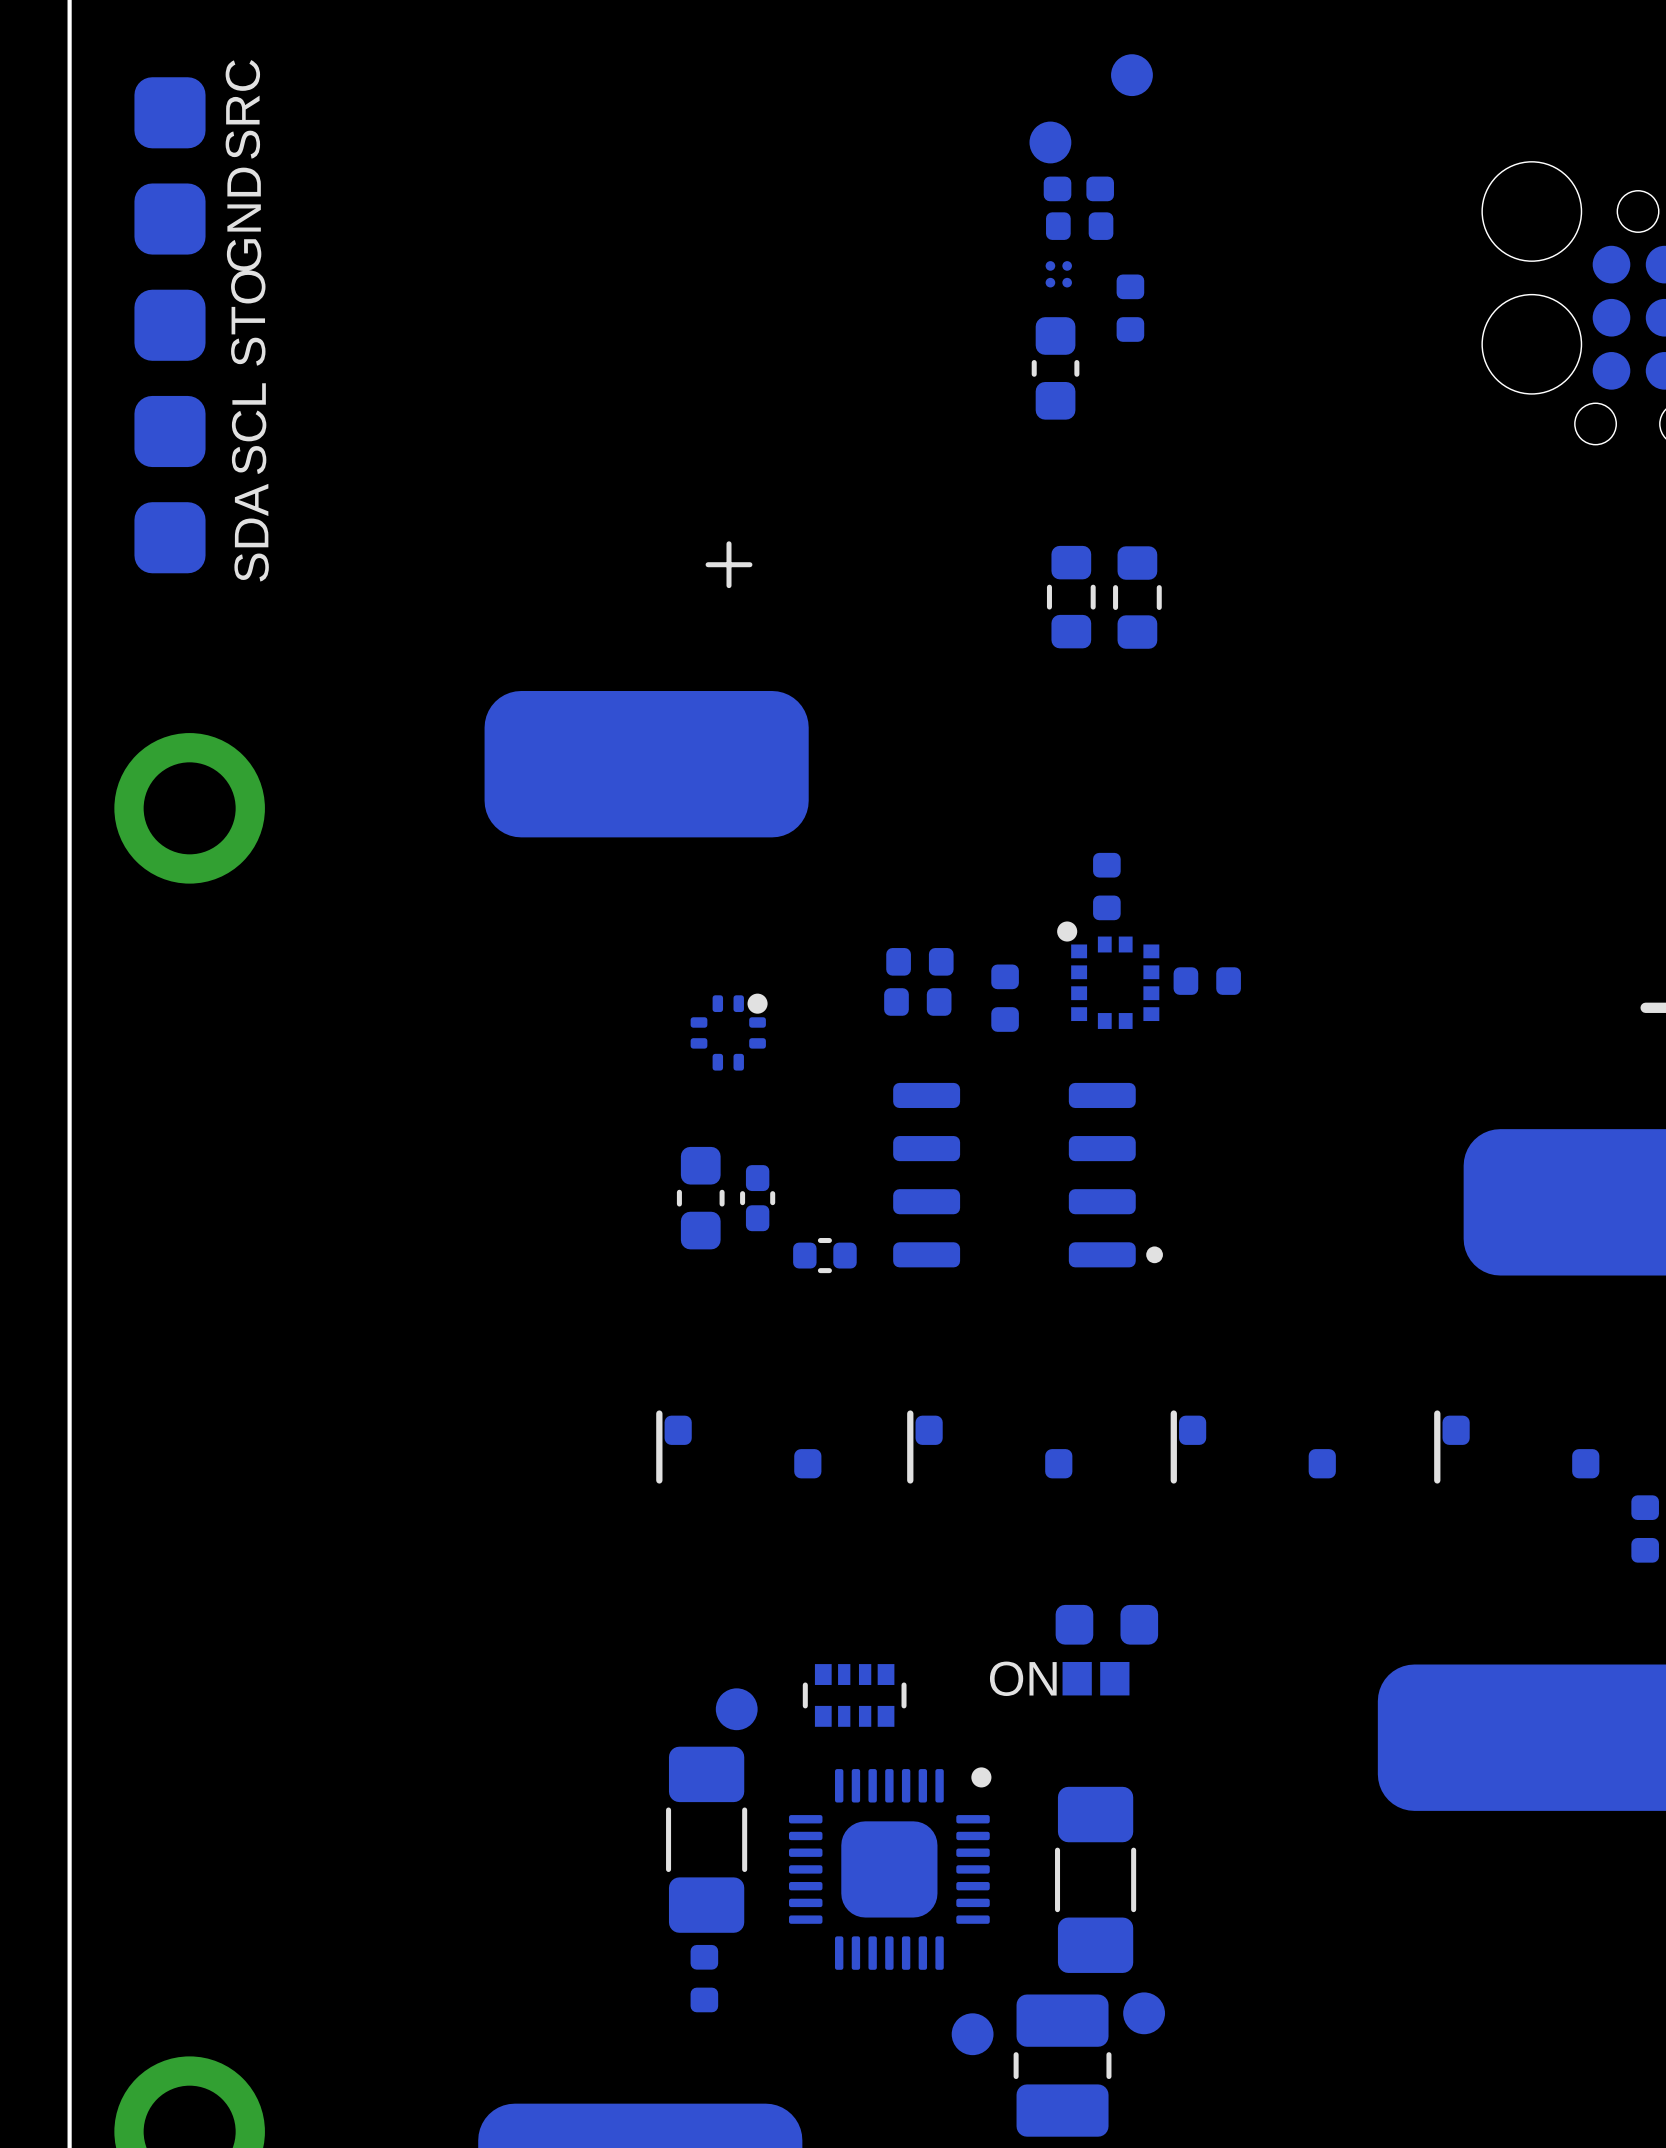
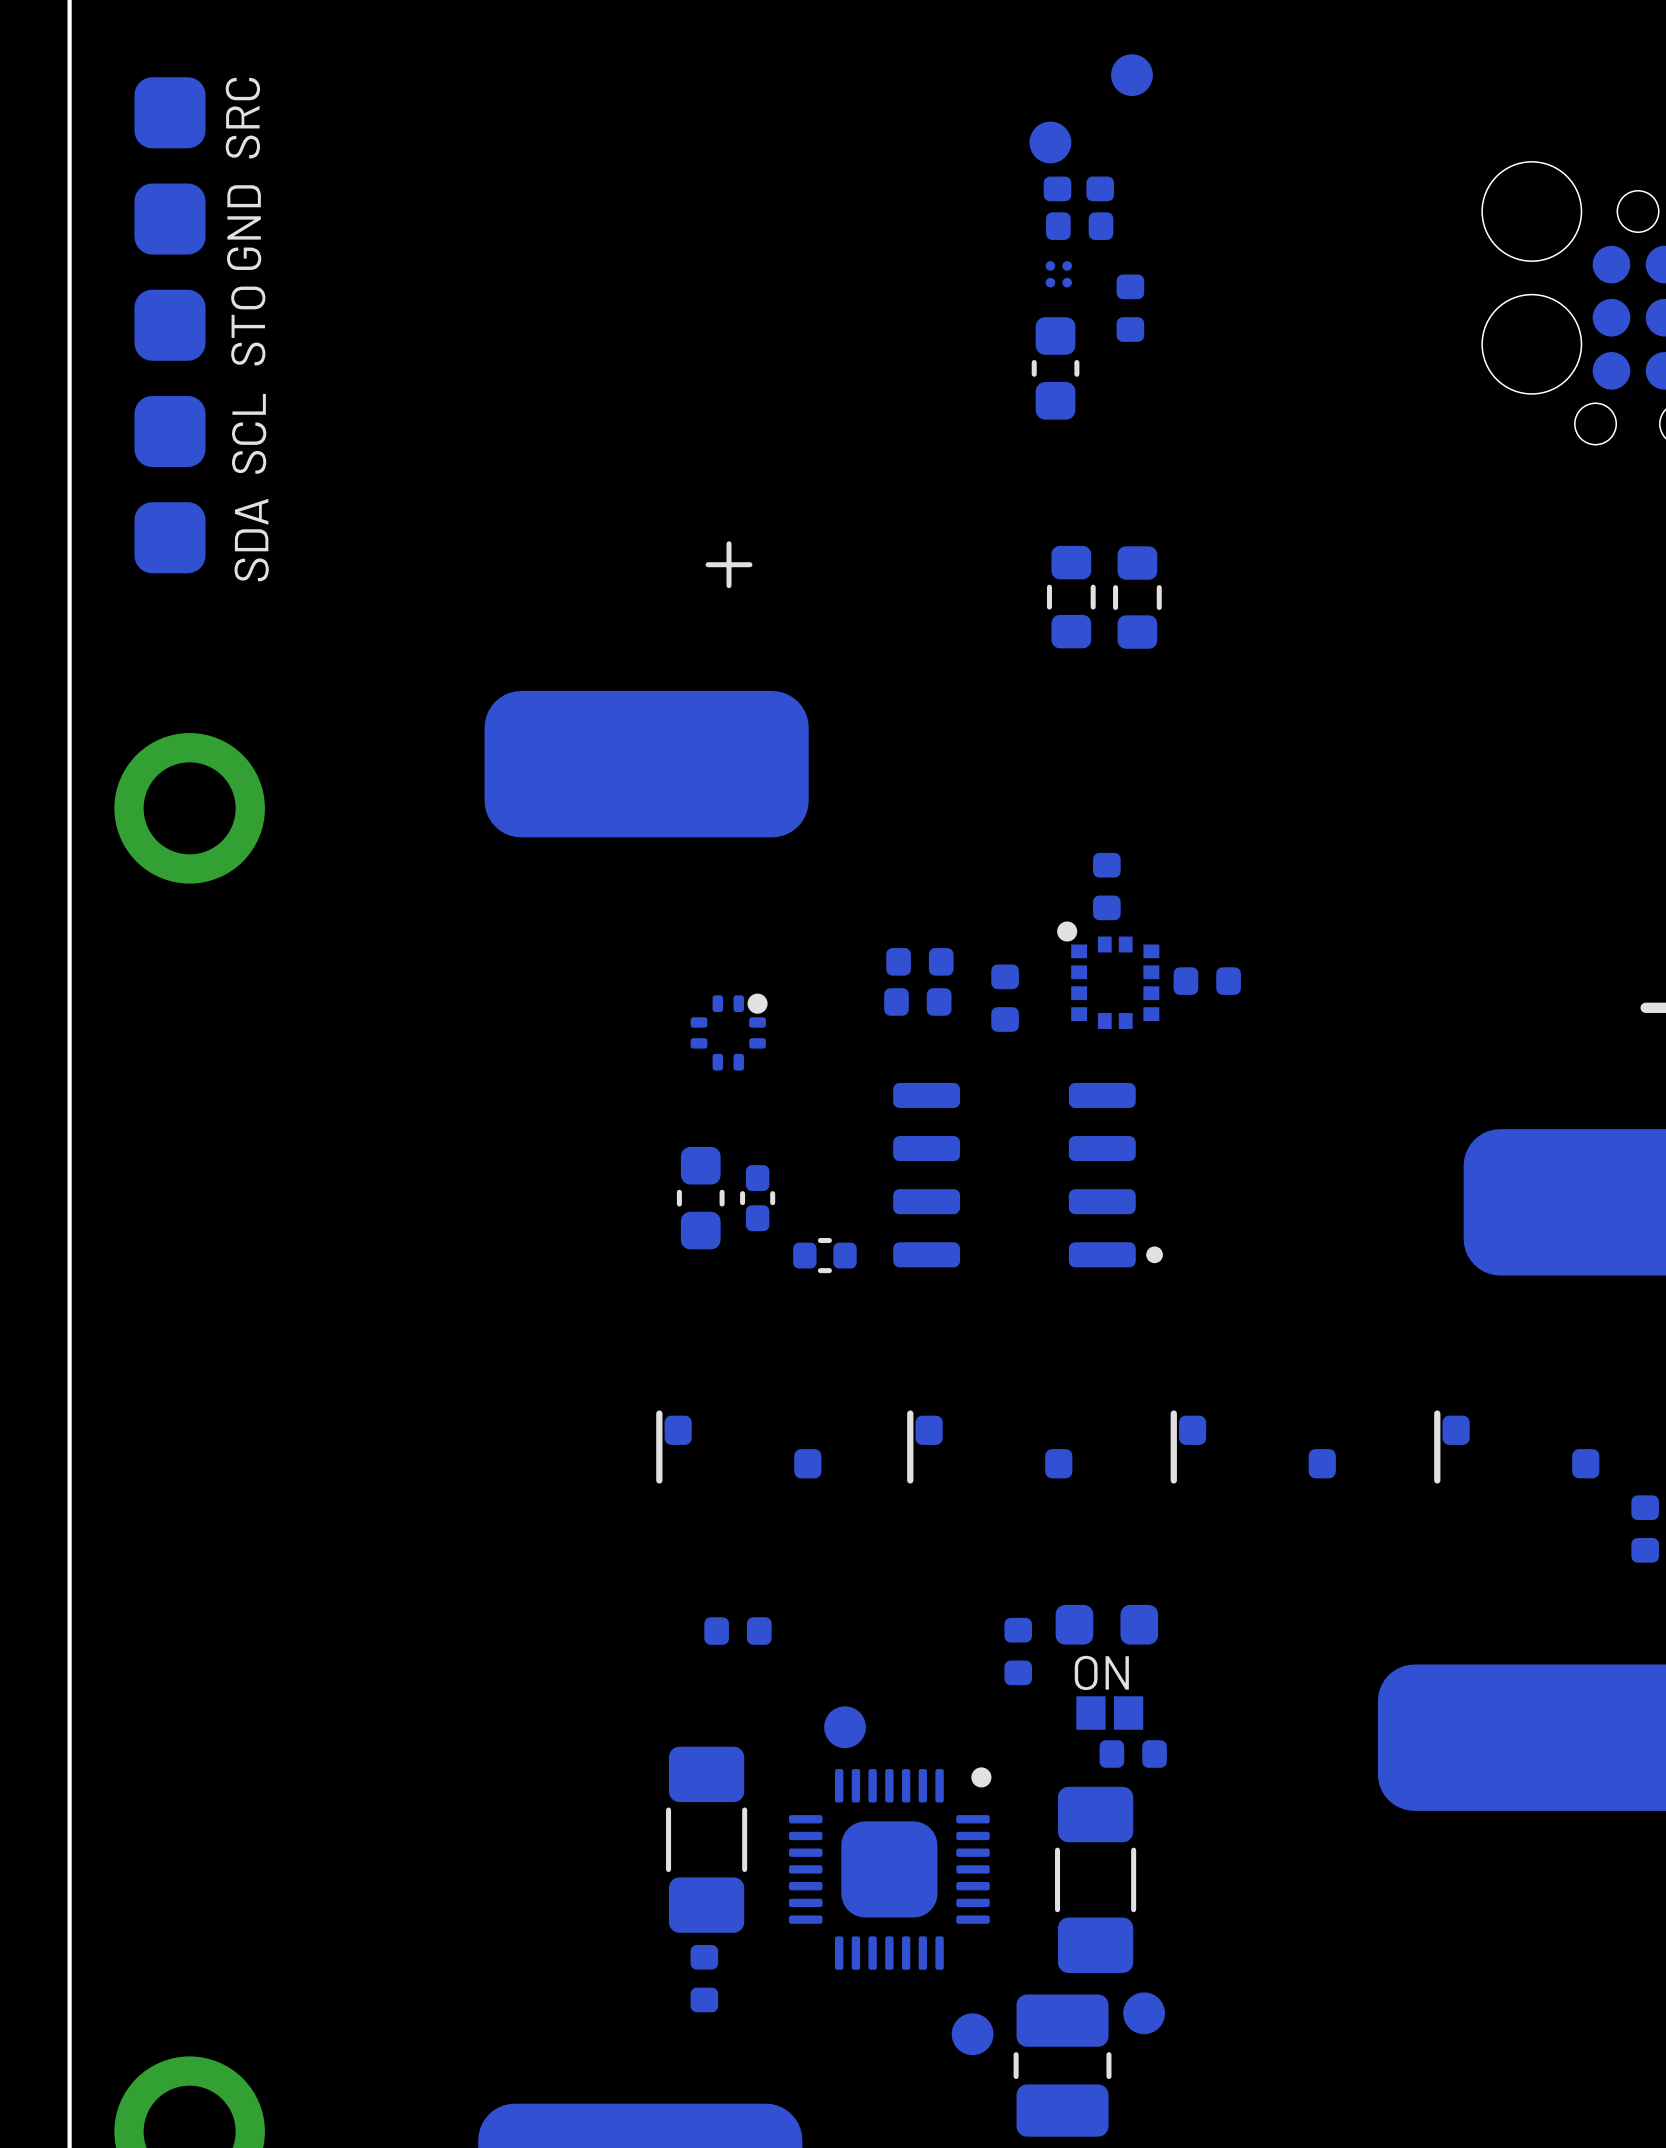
part: none -> (737, 1631)
part: none -> (1018, 1651)
part footprint: [802, 1664, 907, 1727] -> [824, 1706, 866, 1749]
text position: ON (1023, 1678) -> ON (1101, 1672)
part position: (1095, 1678) -> (1109, 1713)
part: (736, 1709) -> none
part: none -> (1133, 1754)

